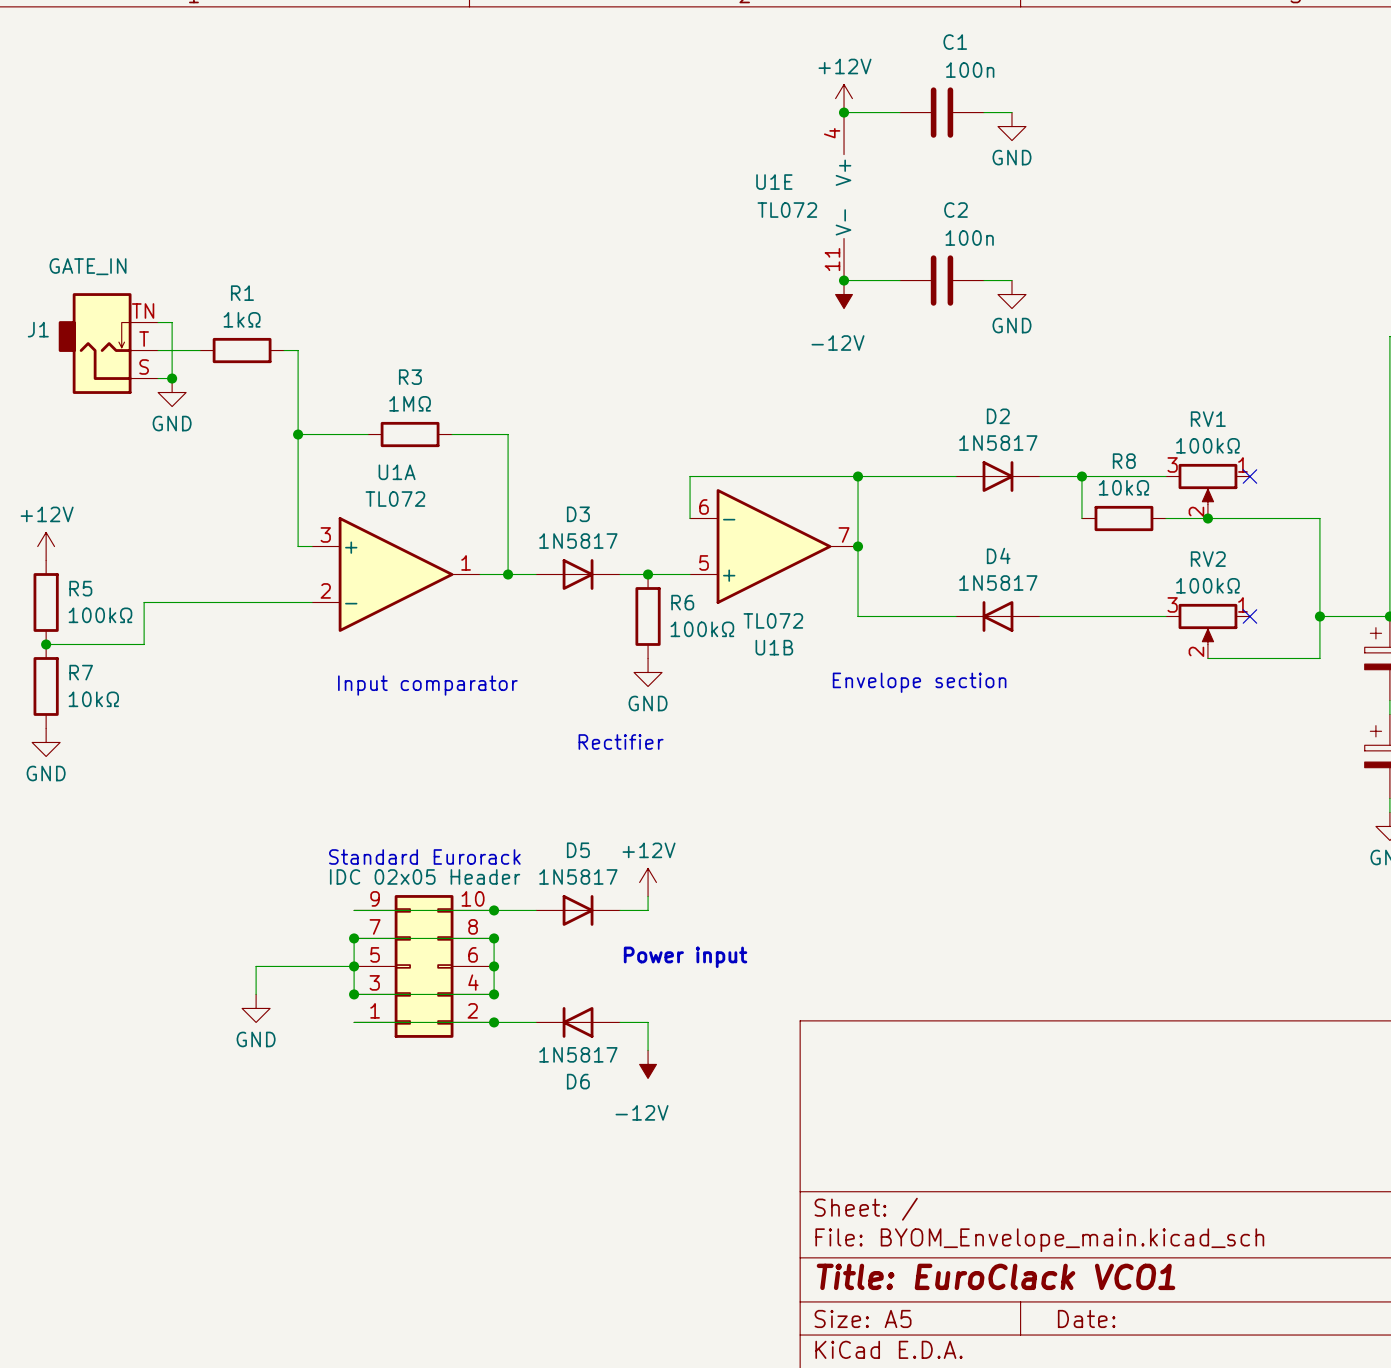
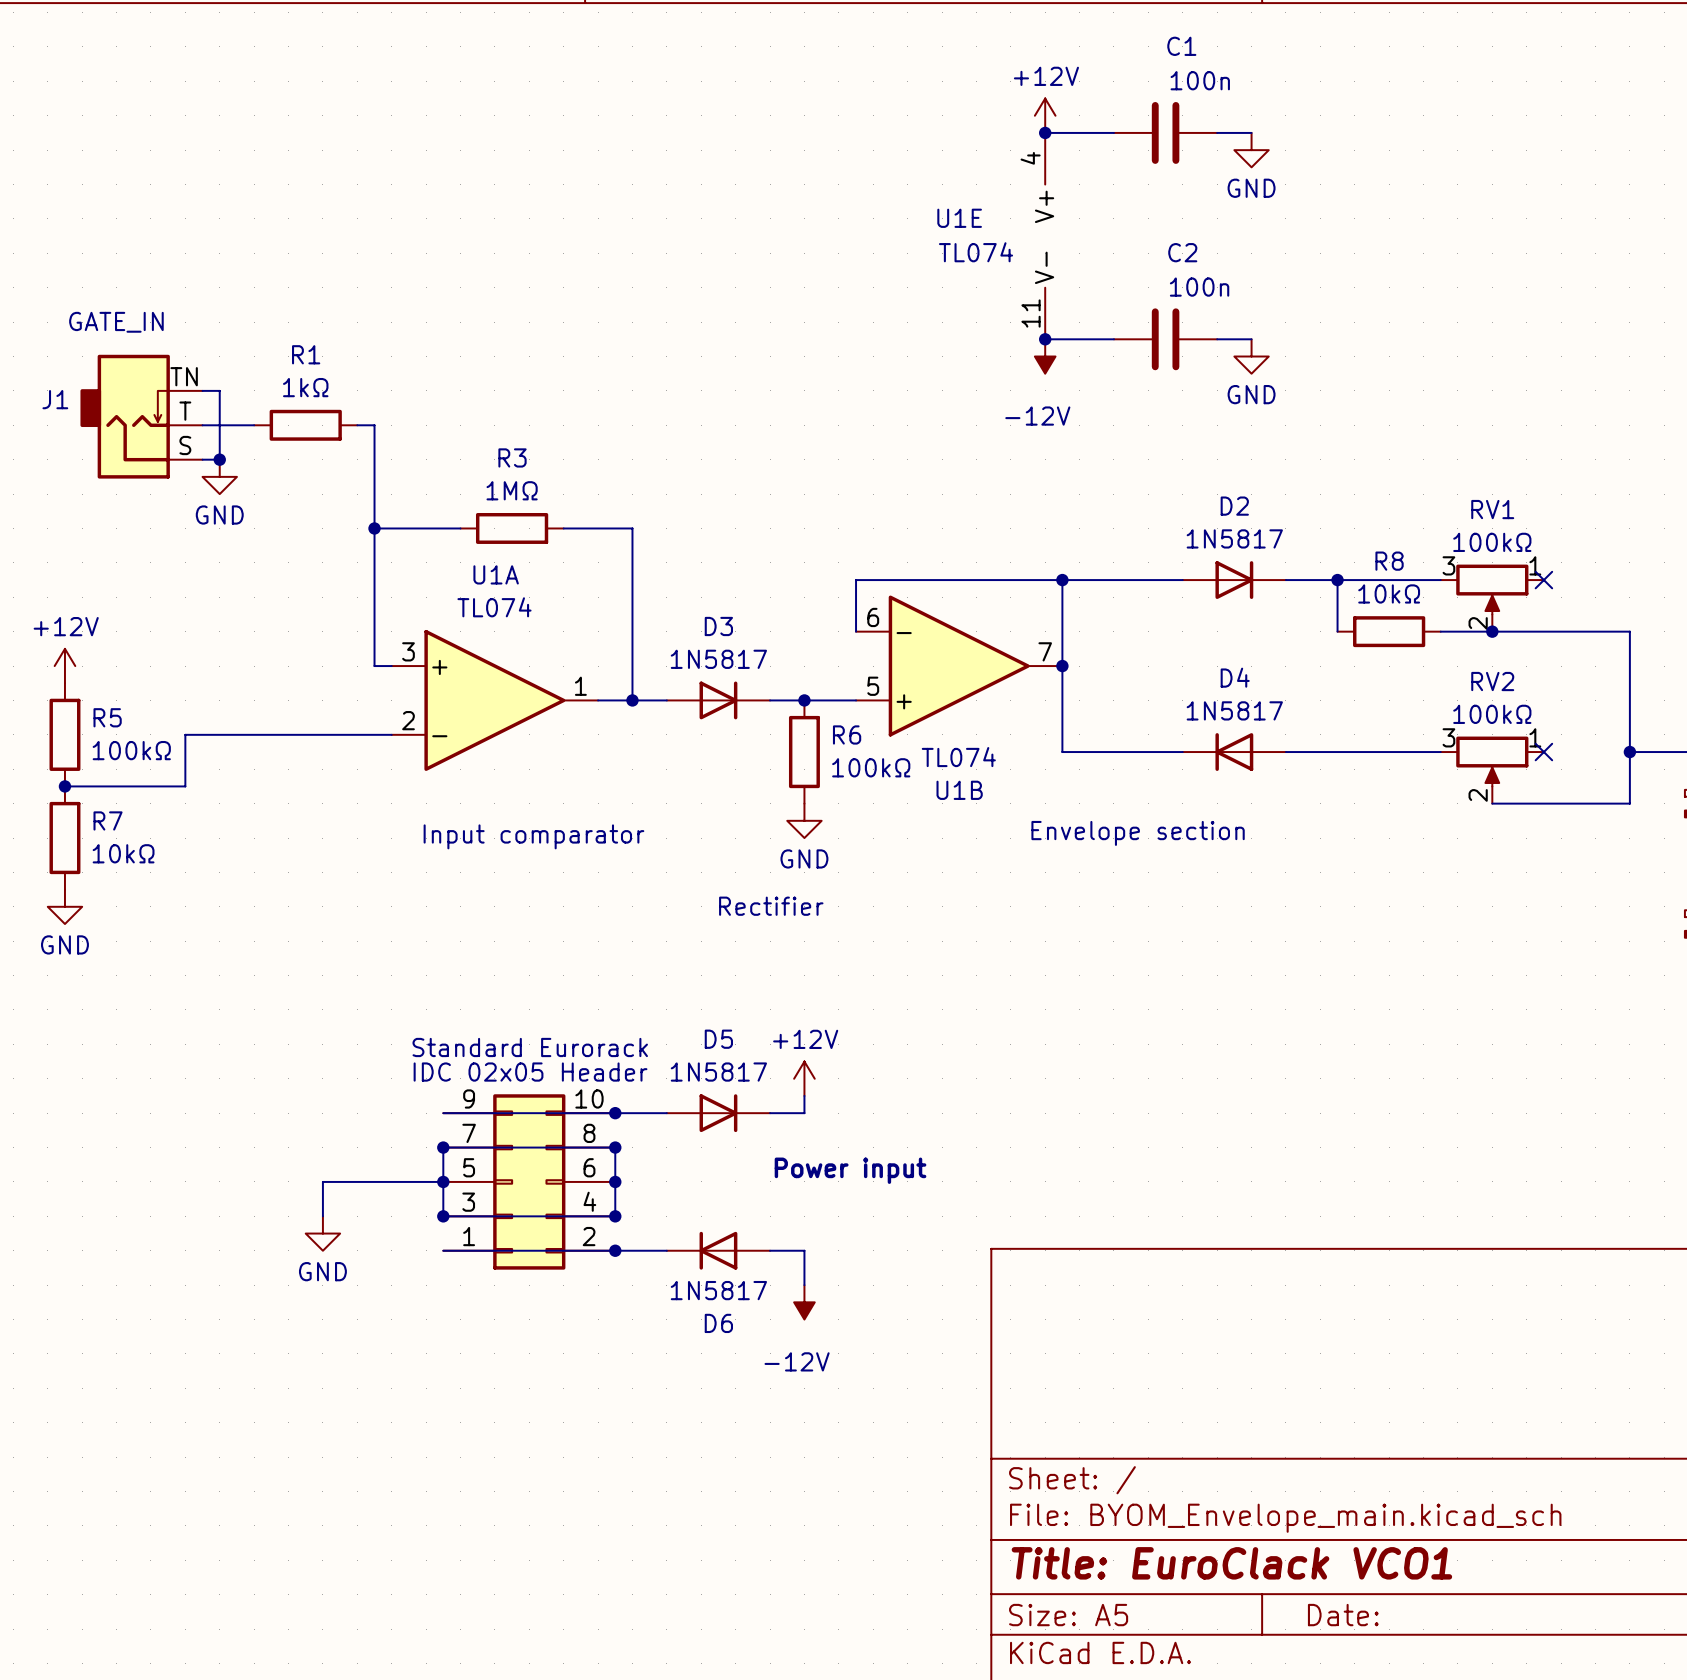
U1E value: TL072 (787, 210) -> TL074 (976, 252)
U1A value: TL072 (395, 499) -> TL074 (494, 607)
U1B value: TL072 (773, 620) -> TL074 (958, 757)

